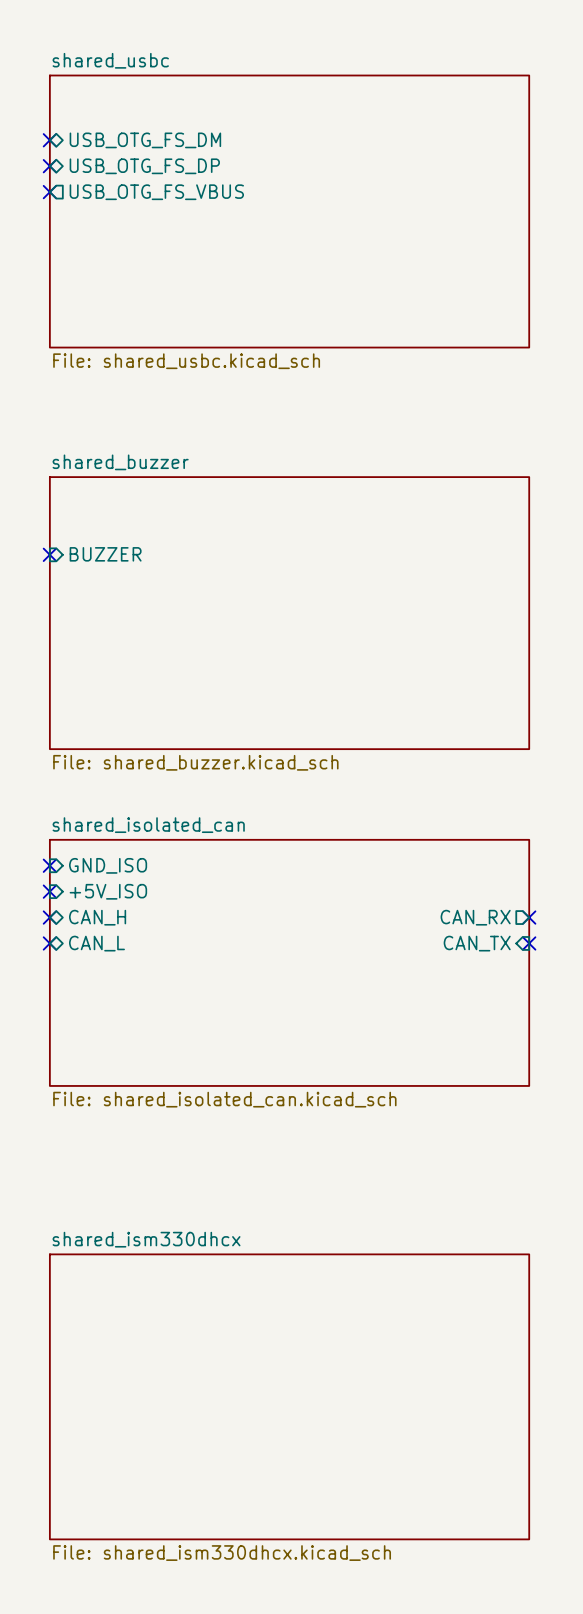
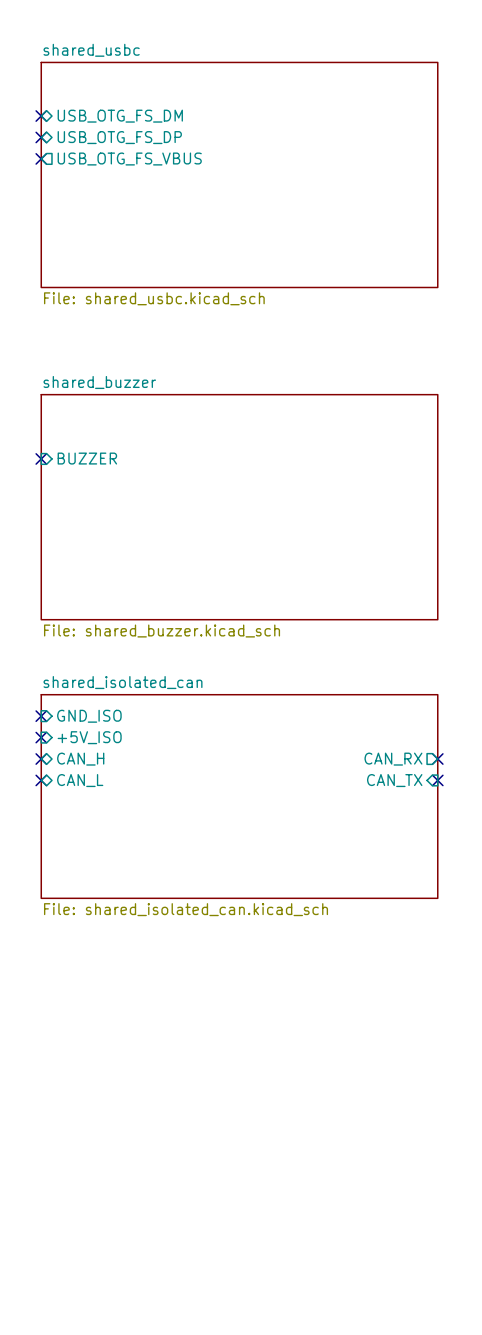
sheet shared_ism330dhcx: File: shared_ism330dhcx.kicad_sch (289, 1396) -> none

